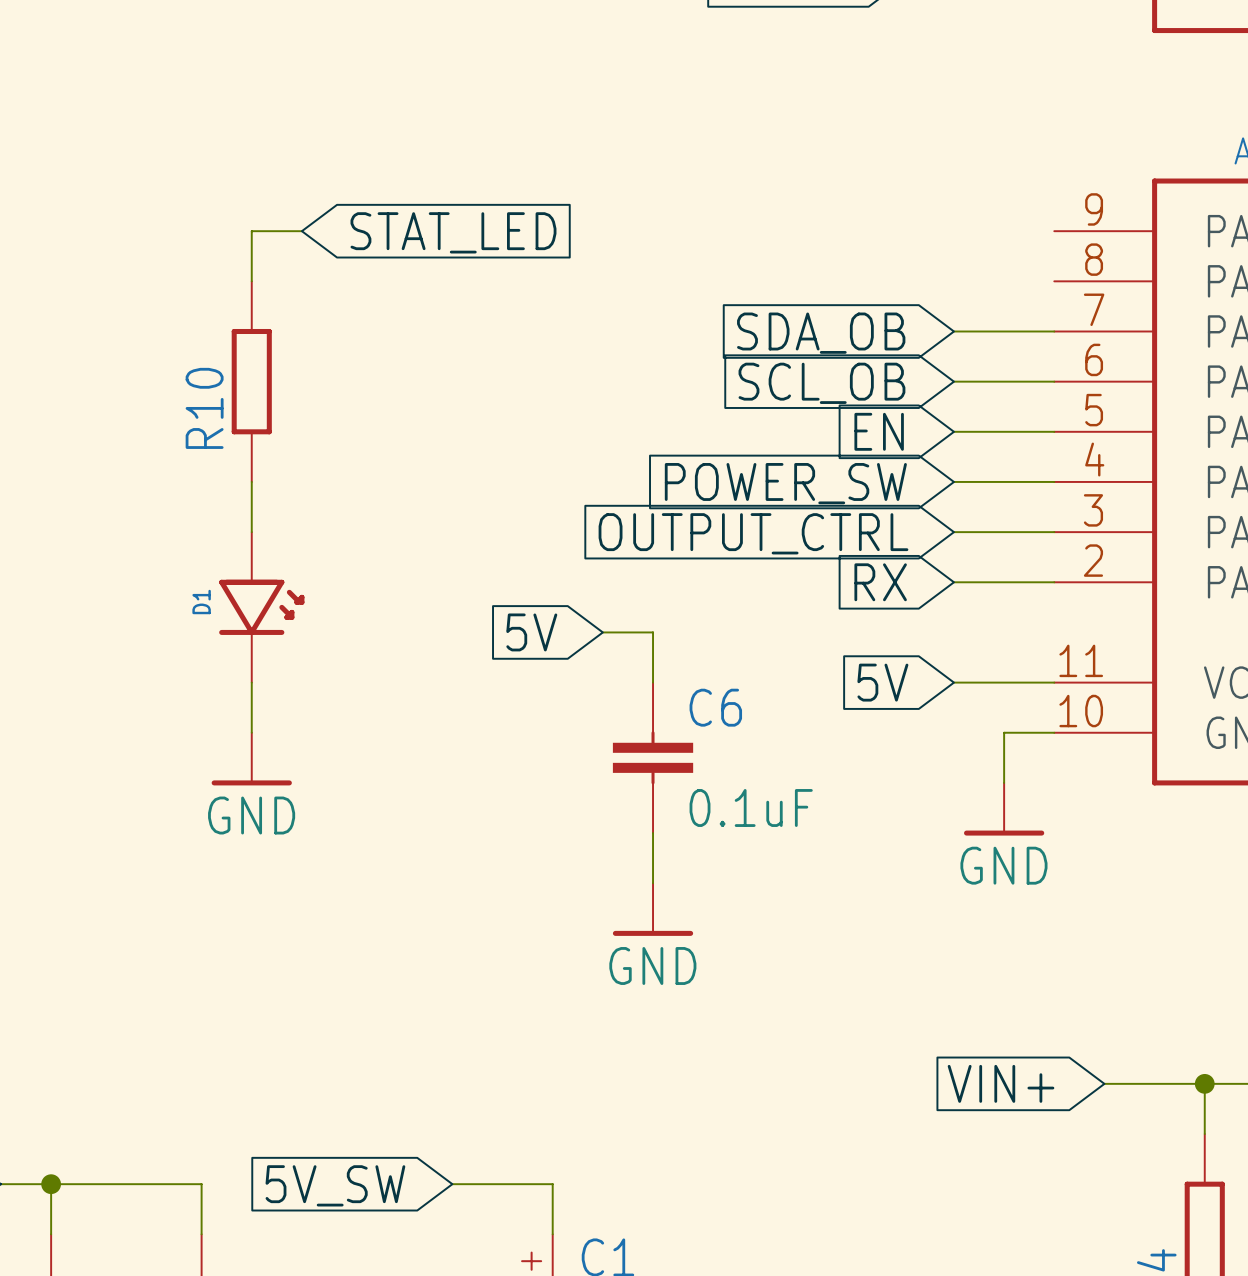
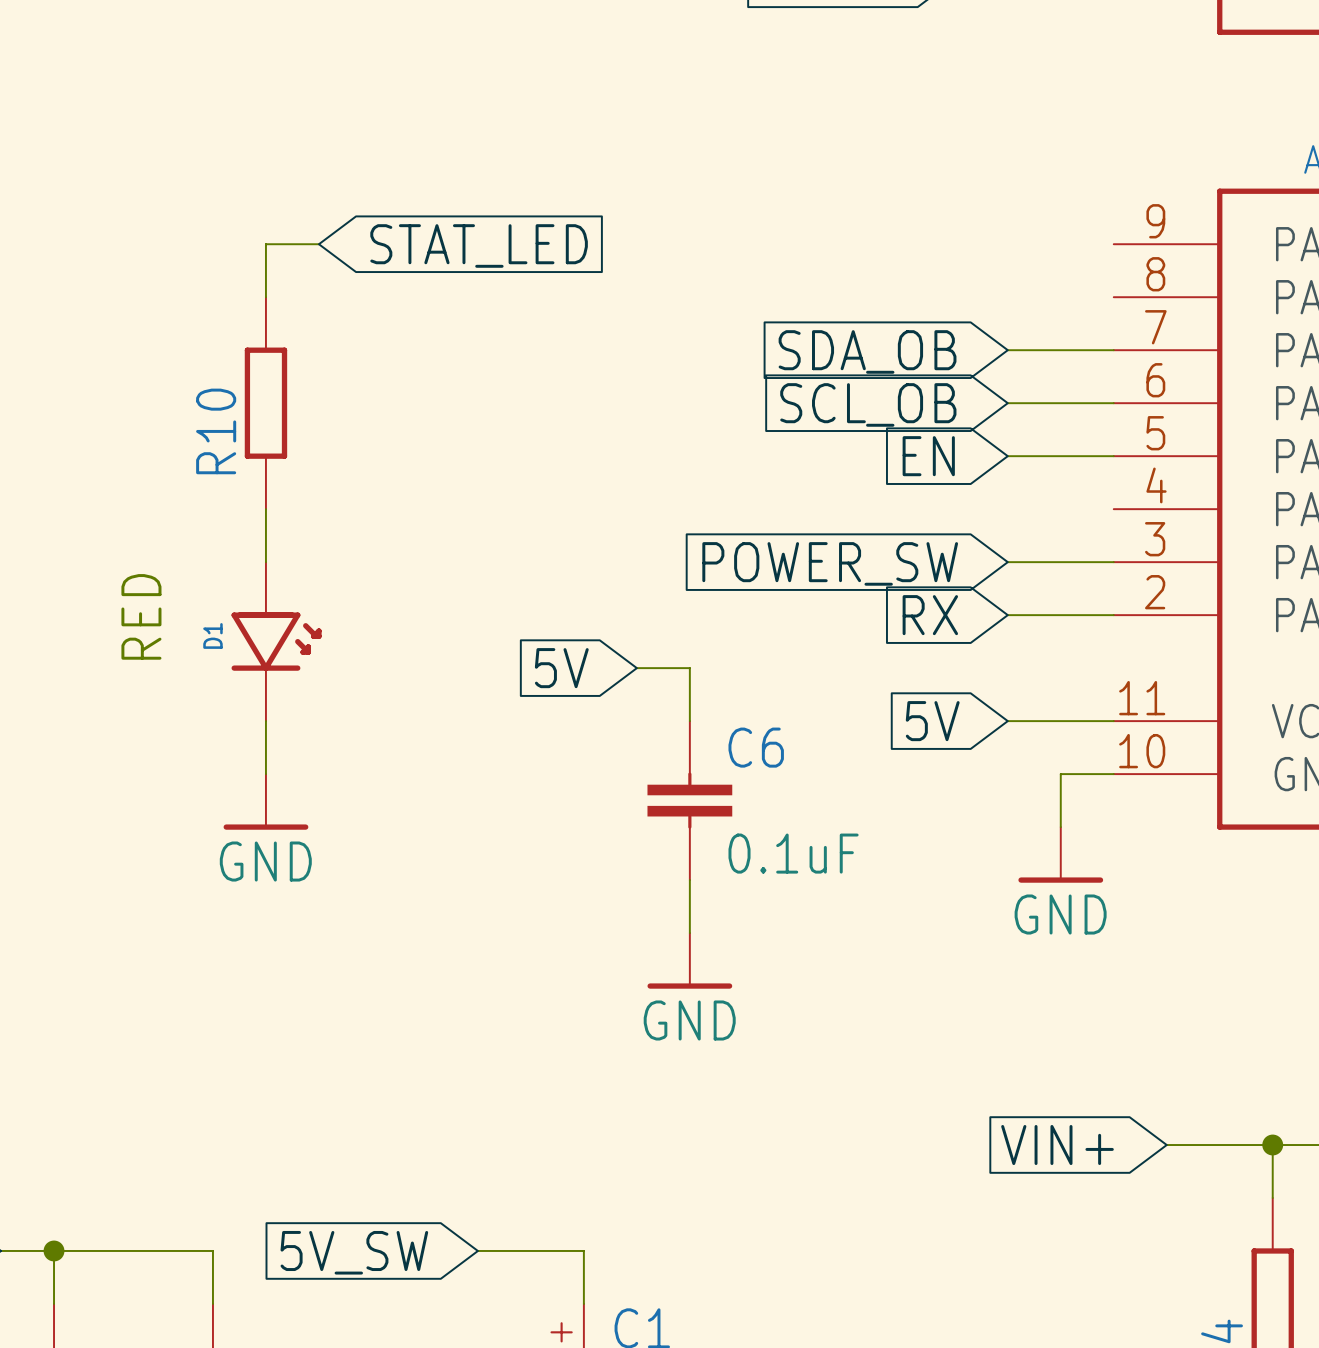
wire: (953, 481) (1054, 481) -> none
global label: POWER_SW (785, 483) -> none
global label: OUTPUT_CTRL (753, 533) -> POWER_SW (830, 563)
text: none -> RED (141, 616)

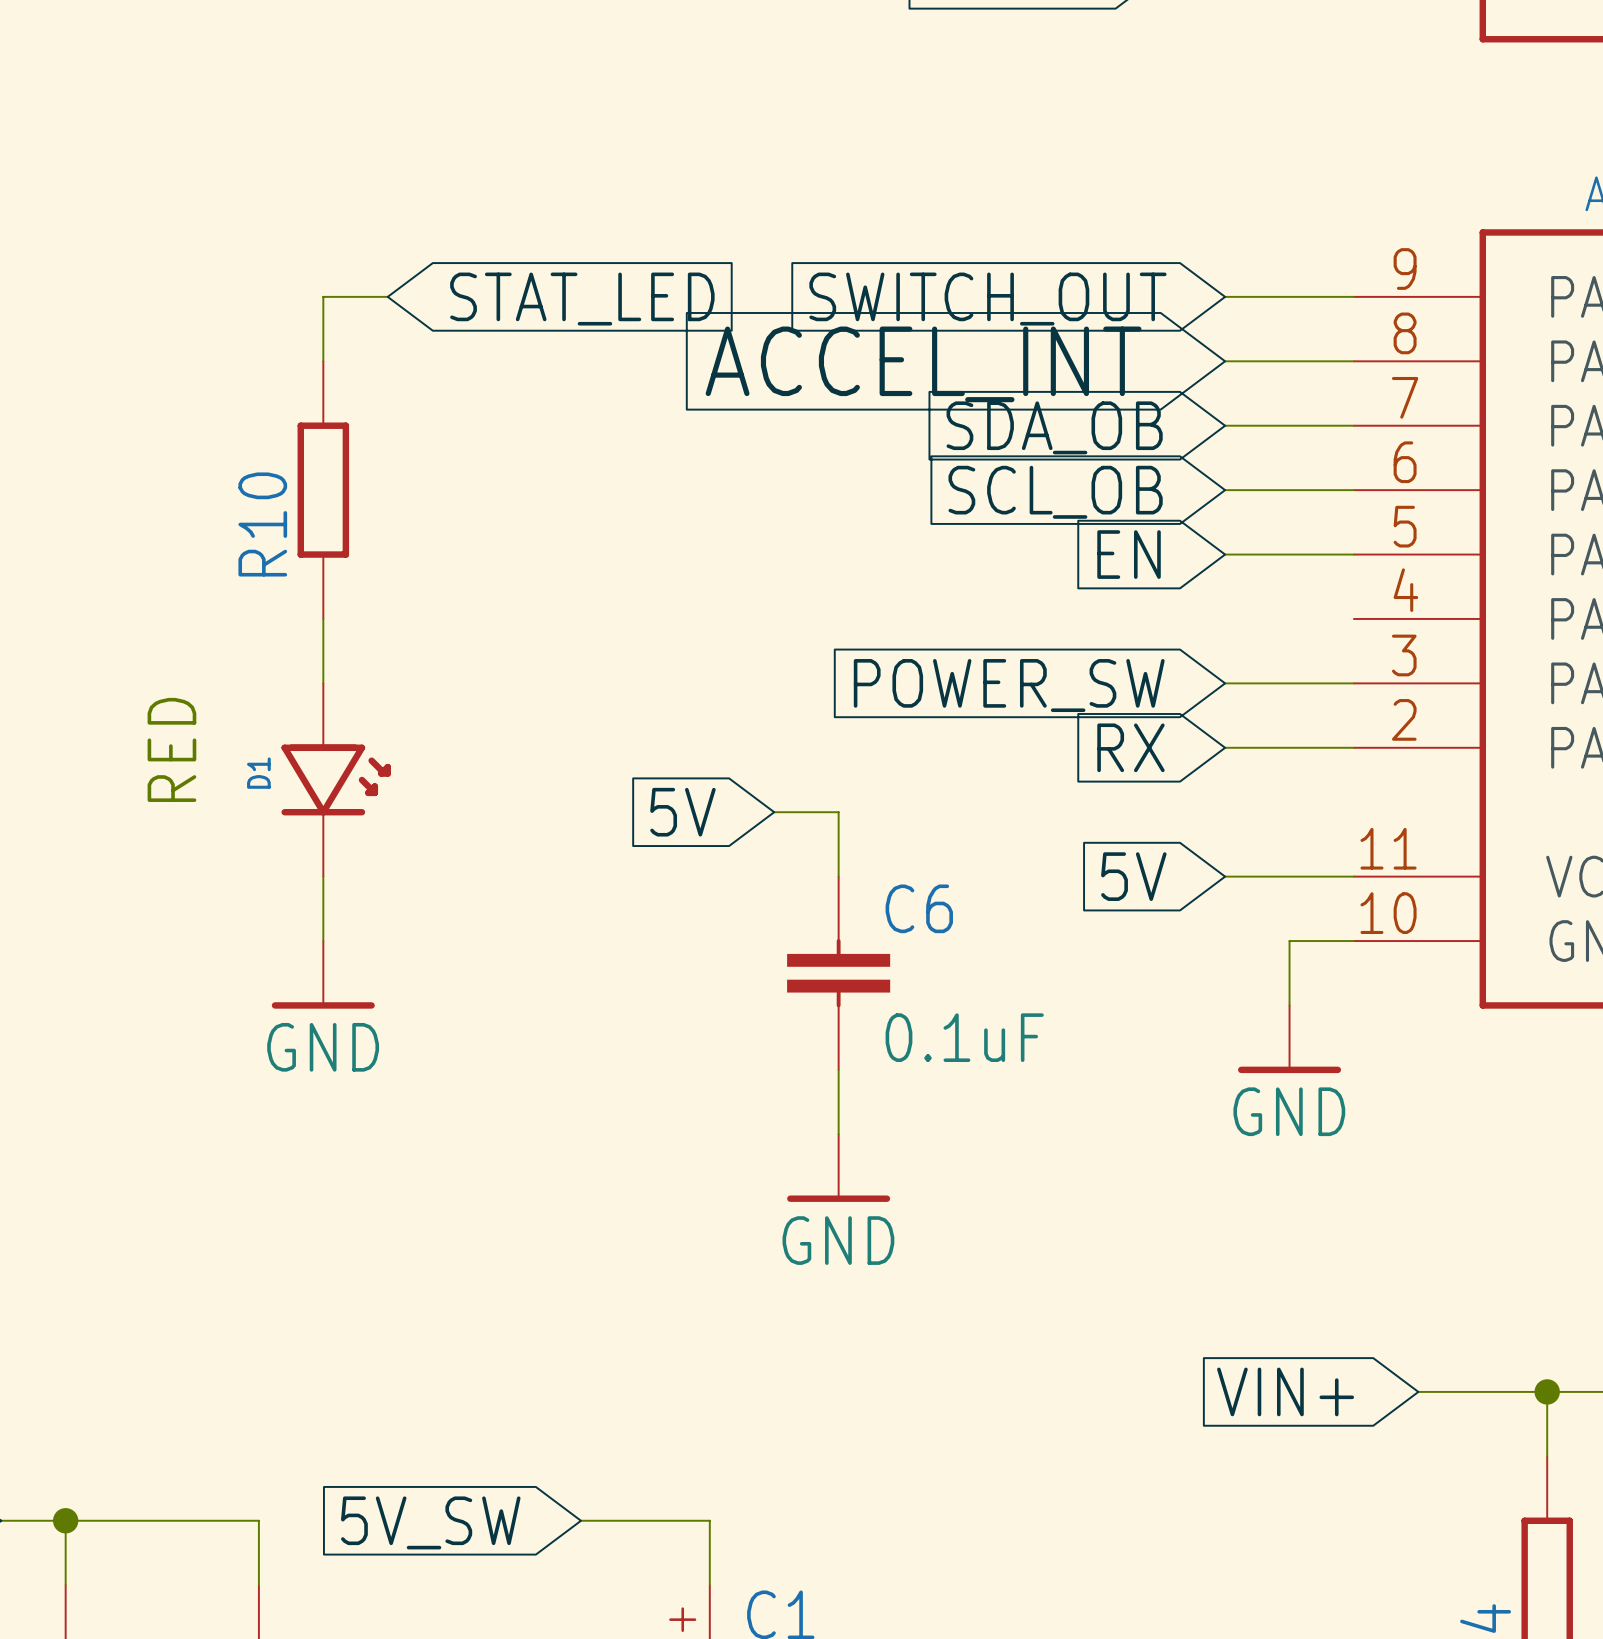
wire: none -> (1225, 296) (1353, 296)
global label: none -> SWITCH_OUT (987, 299)
wire: none -> (1225, 361) (1353, 361)
global label: none -> ACCEL_INT (923, 364)

